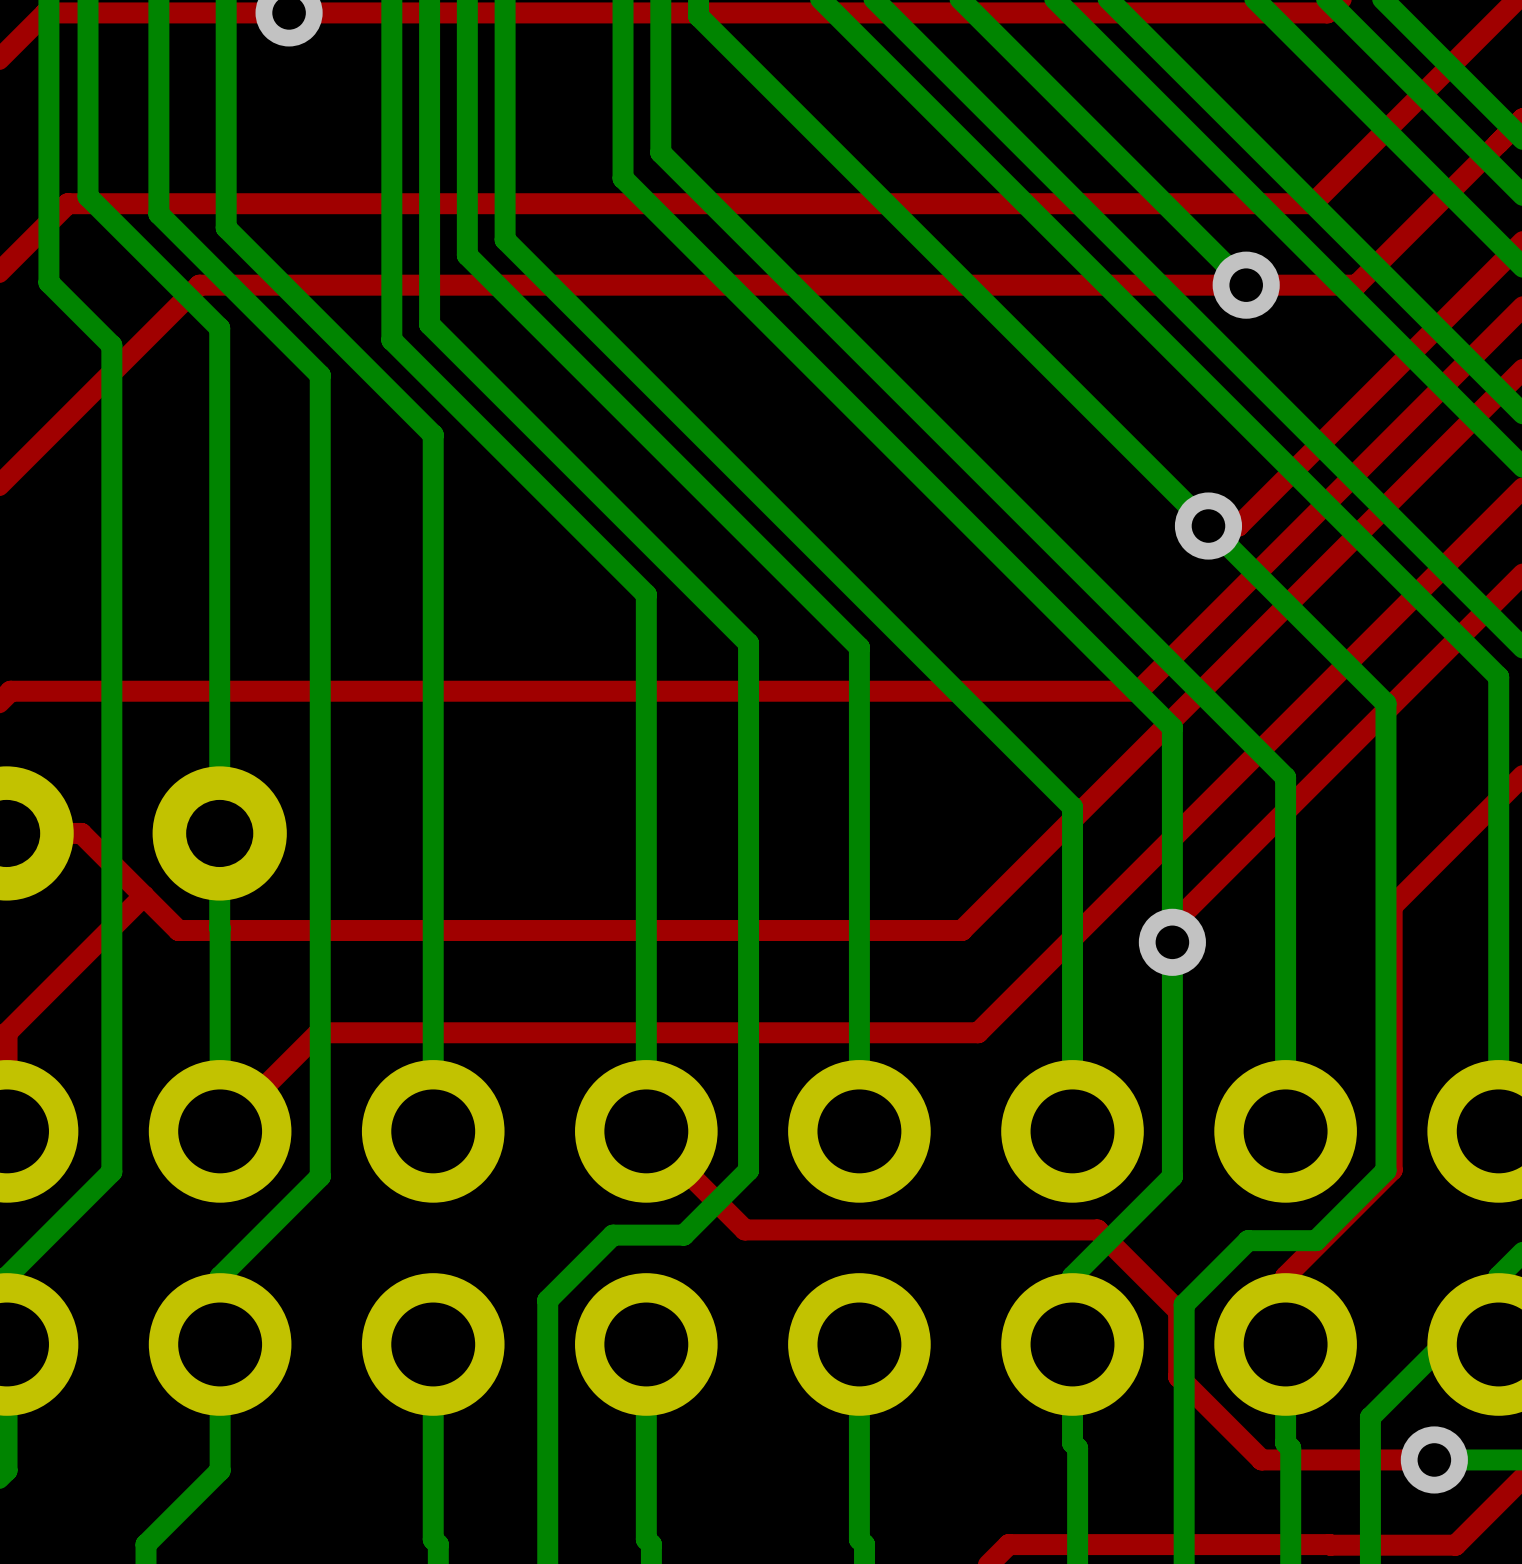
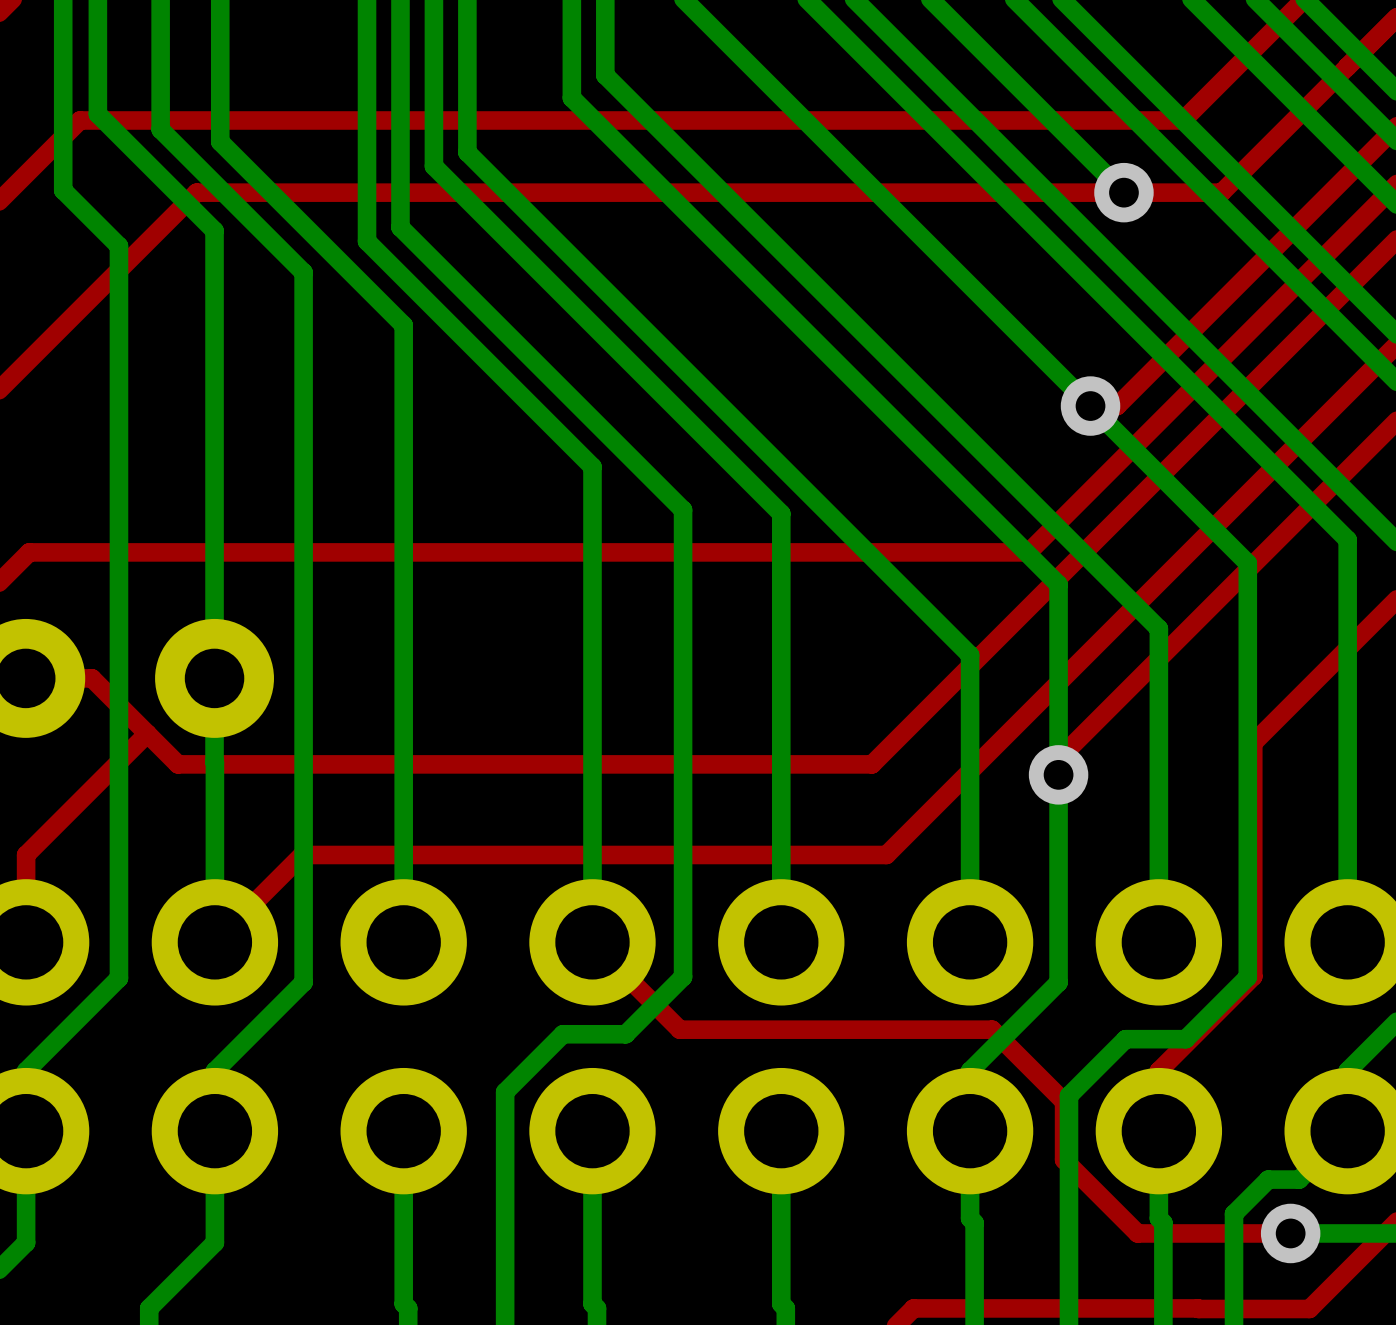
bottom track: (1498, 1344) (1443, 1344) (1370, 1417) (1370, 1437) -> (1347, 1131) (1299, 1179) (1268, 1179) (1234, 1213)

